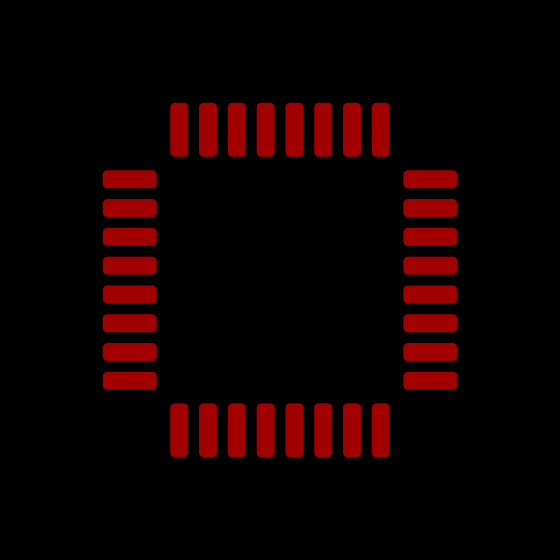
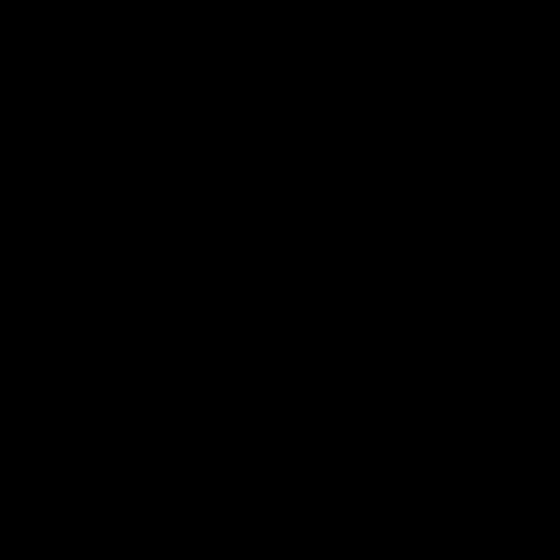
part: (280, 280) -> none

